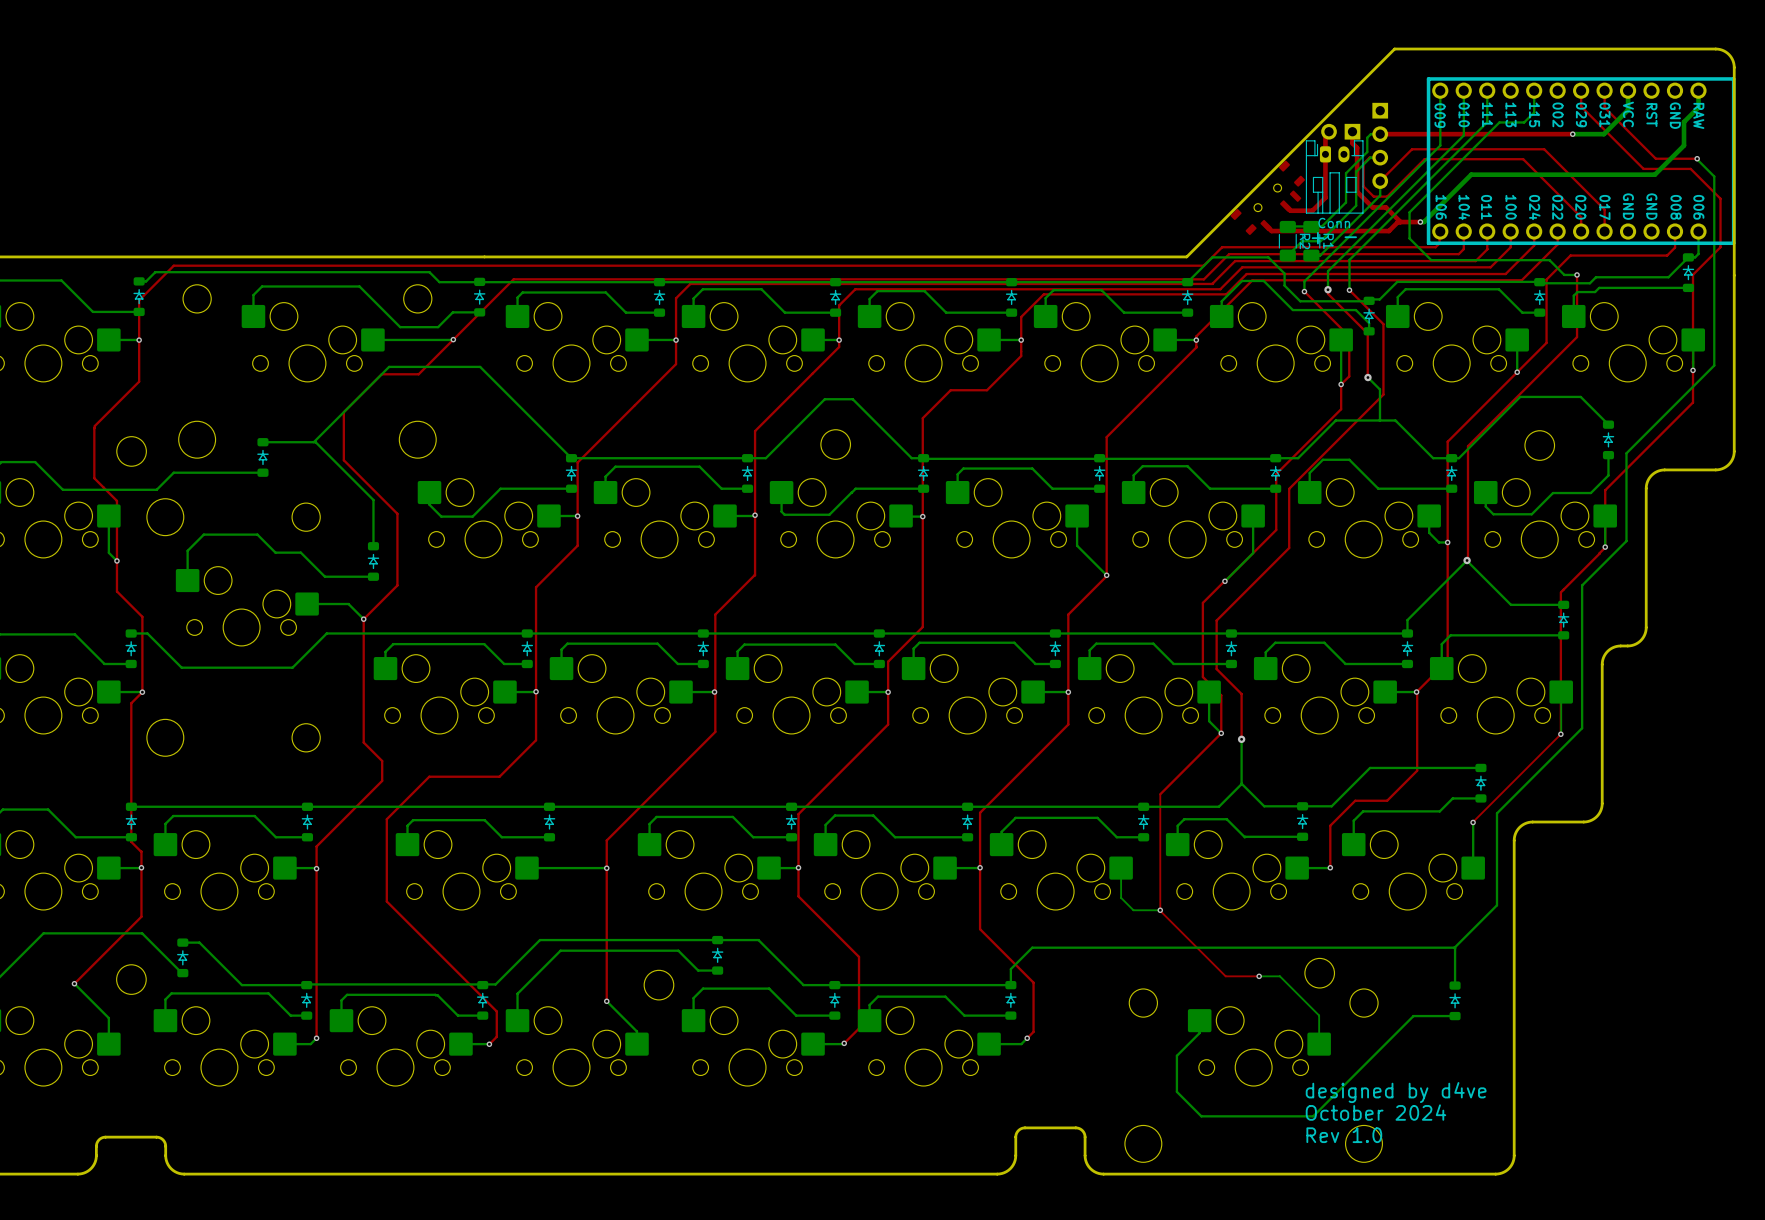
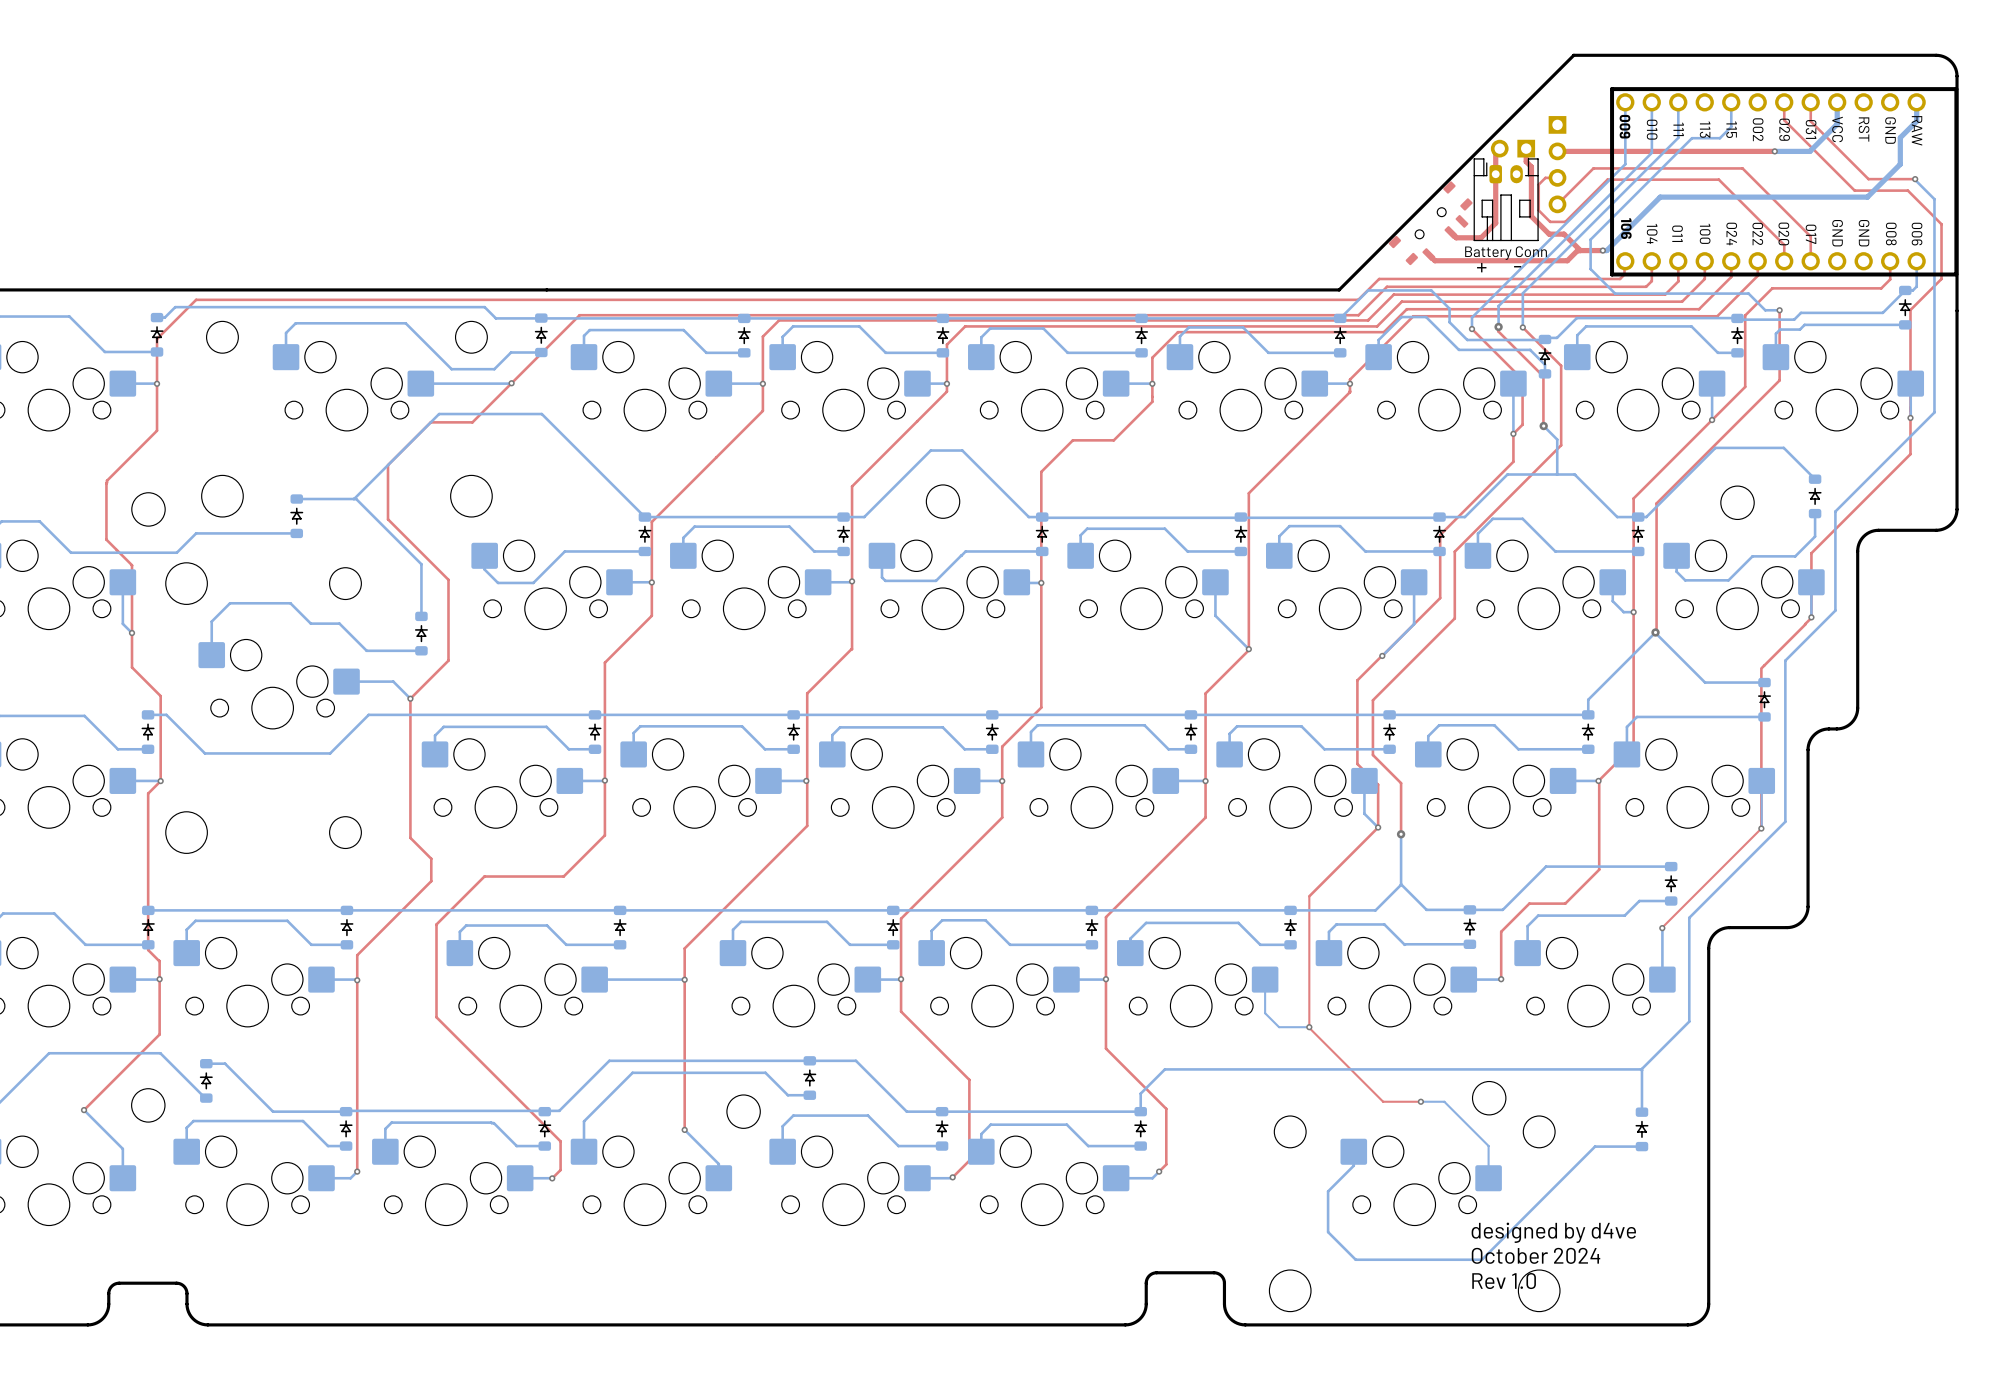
bottom track: (1380, 134) (1370, 134) (1367, 137) (1367, 152) (1346, 173) (1346, 202) (1321, 226) (1285, 226) -> none
bottom track: (1380, 157) (1370, 157) (1356, 171) (1356, 205) (1320, 241) (1302, 241) (1287, 255) -> none
bottom track: (1380, 181) (1380, 195) (1320, 255) (1311, 255) -> none
part value: Conn (1334, 223) -> Battery Conn (1506, 253)
R2: (1287, 241) -> none
R1: (1311, 241) -> none

